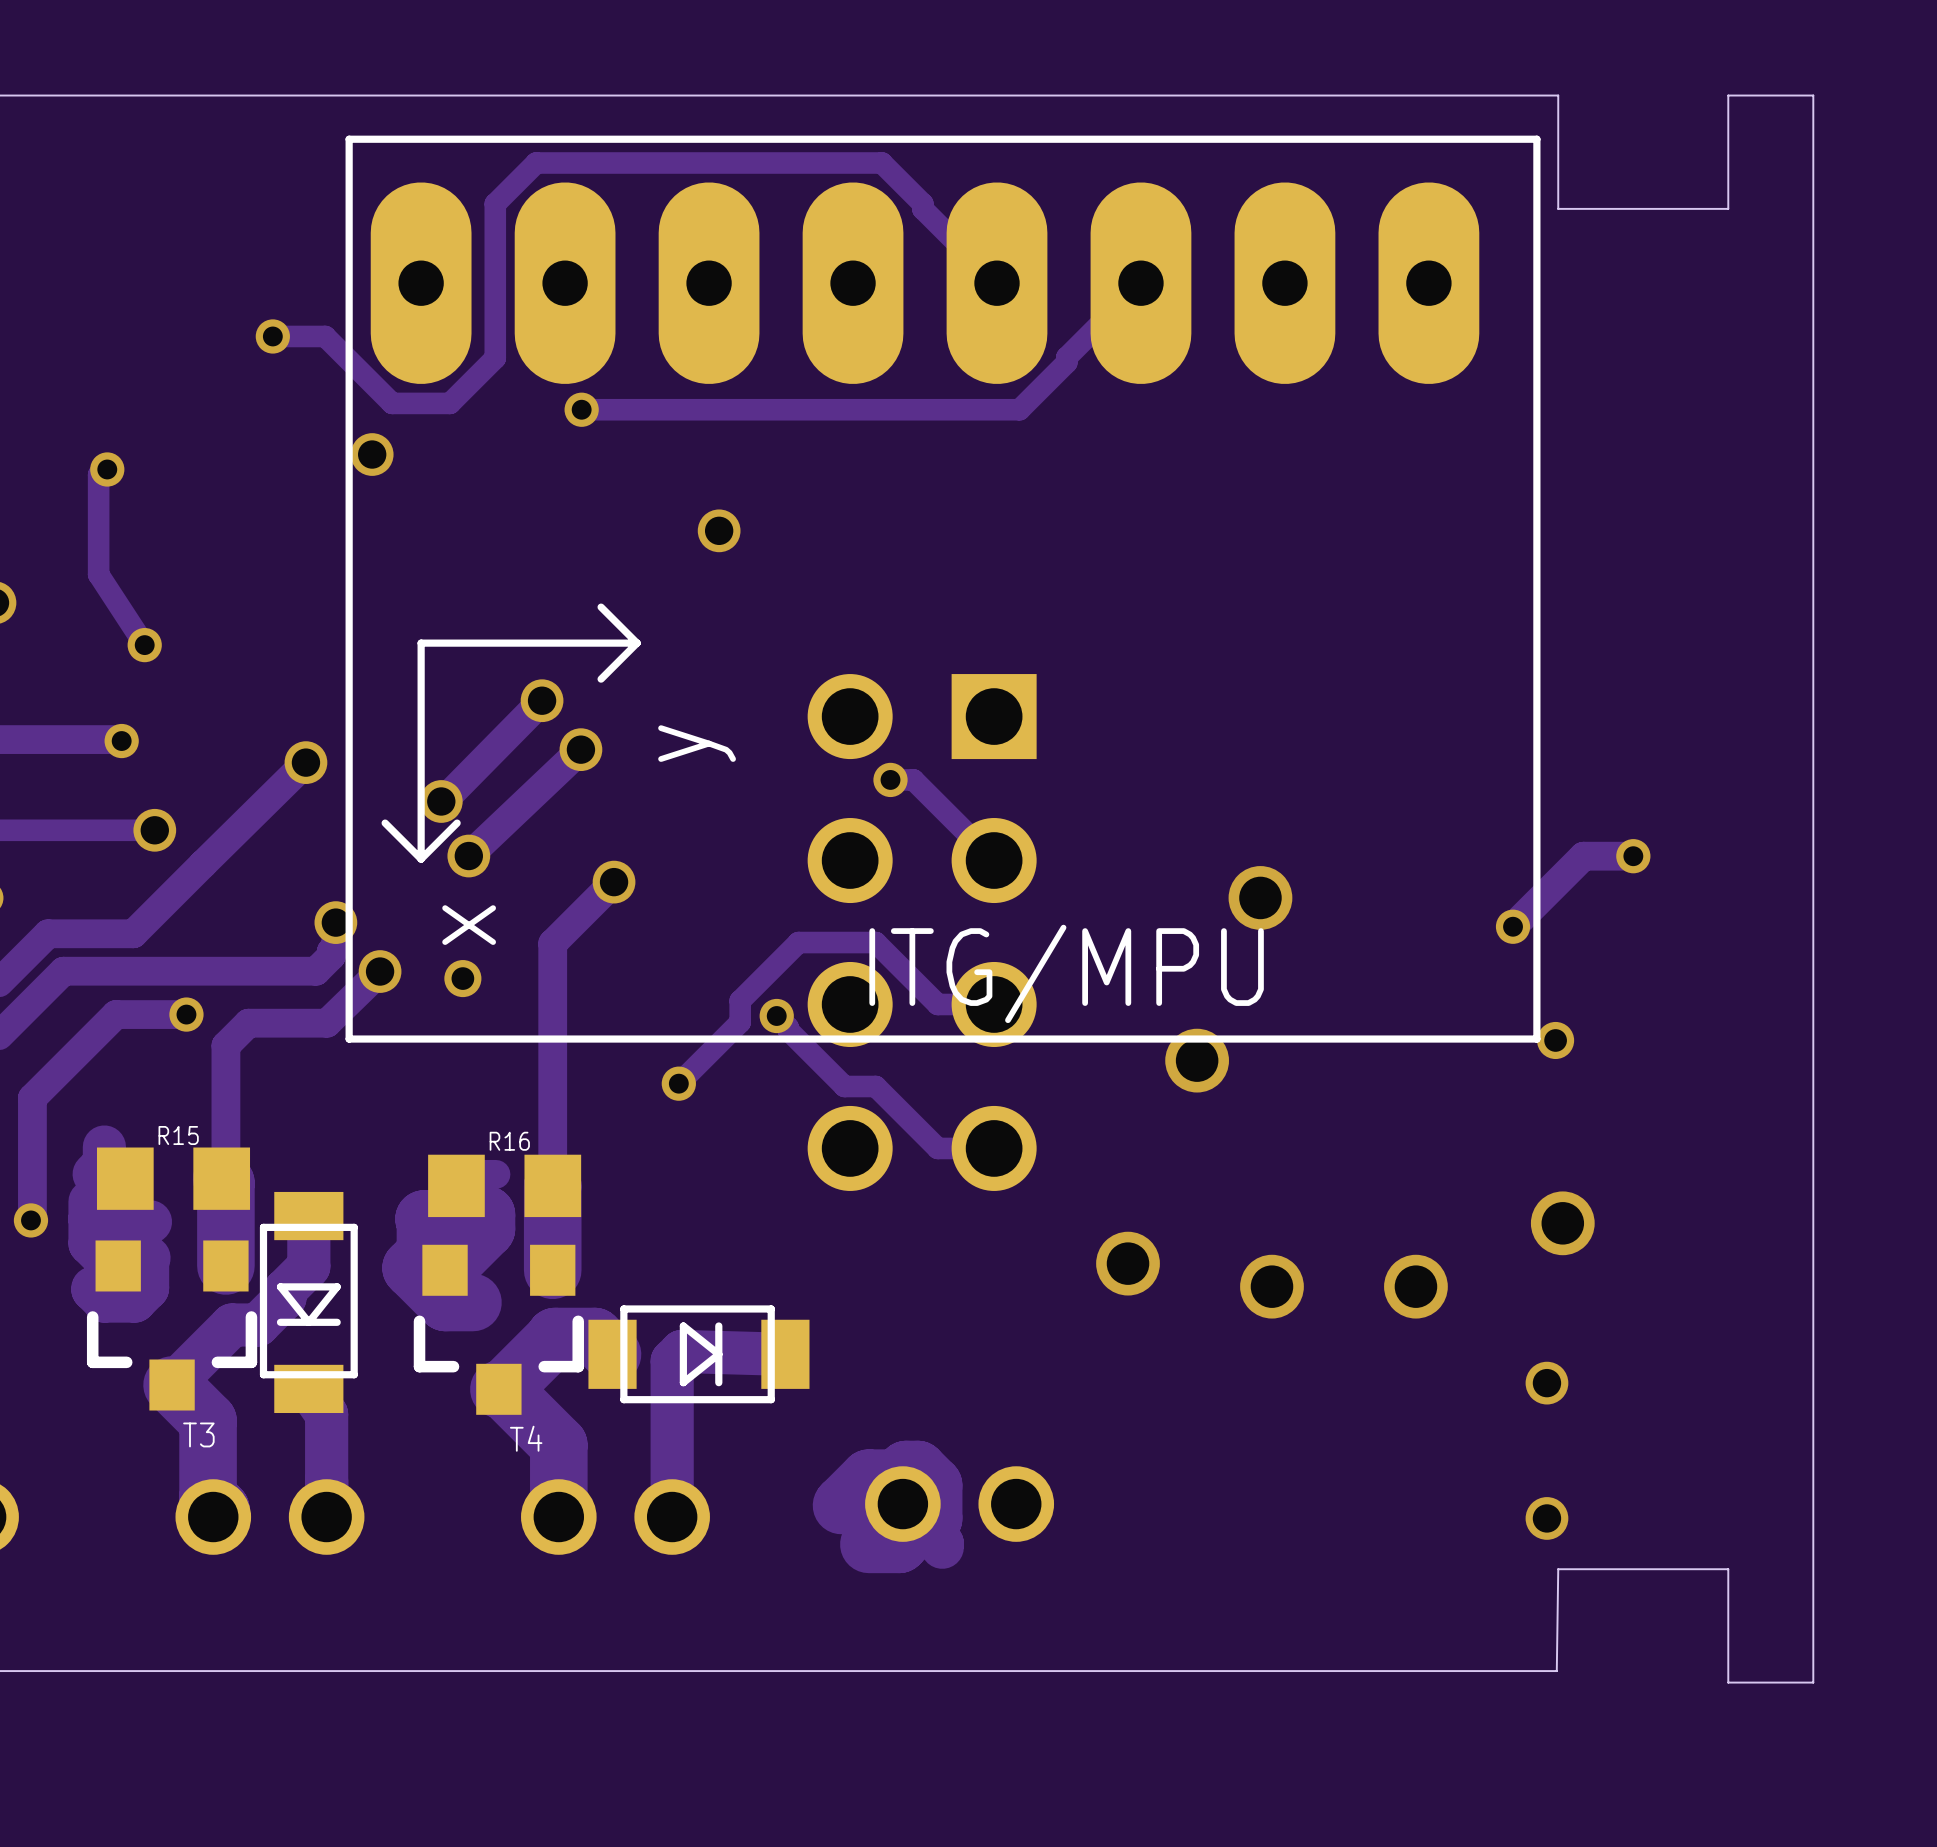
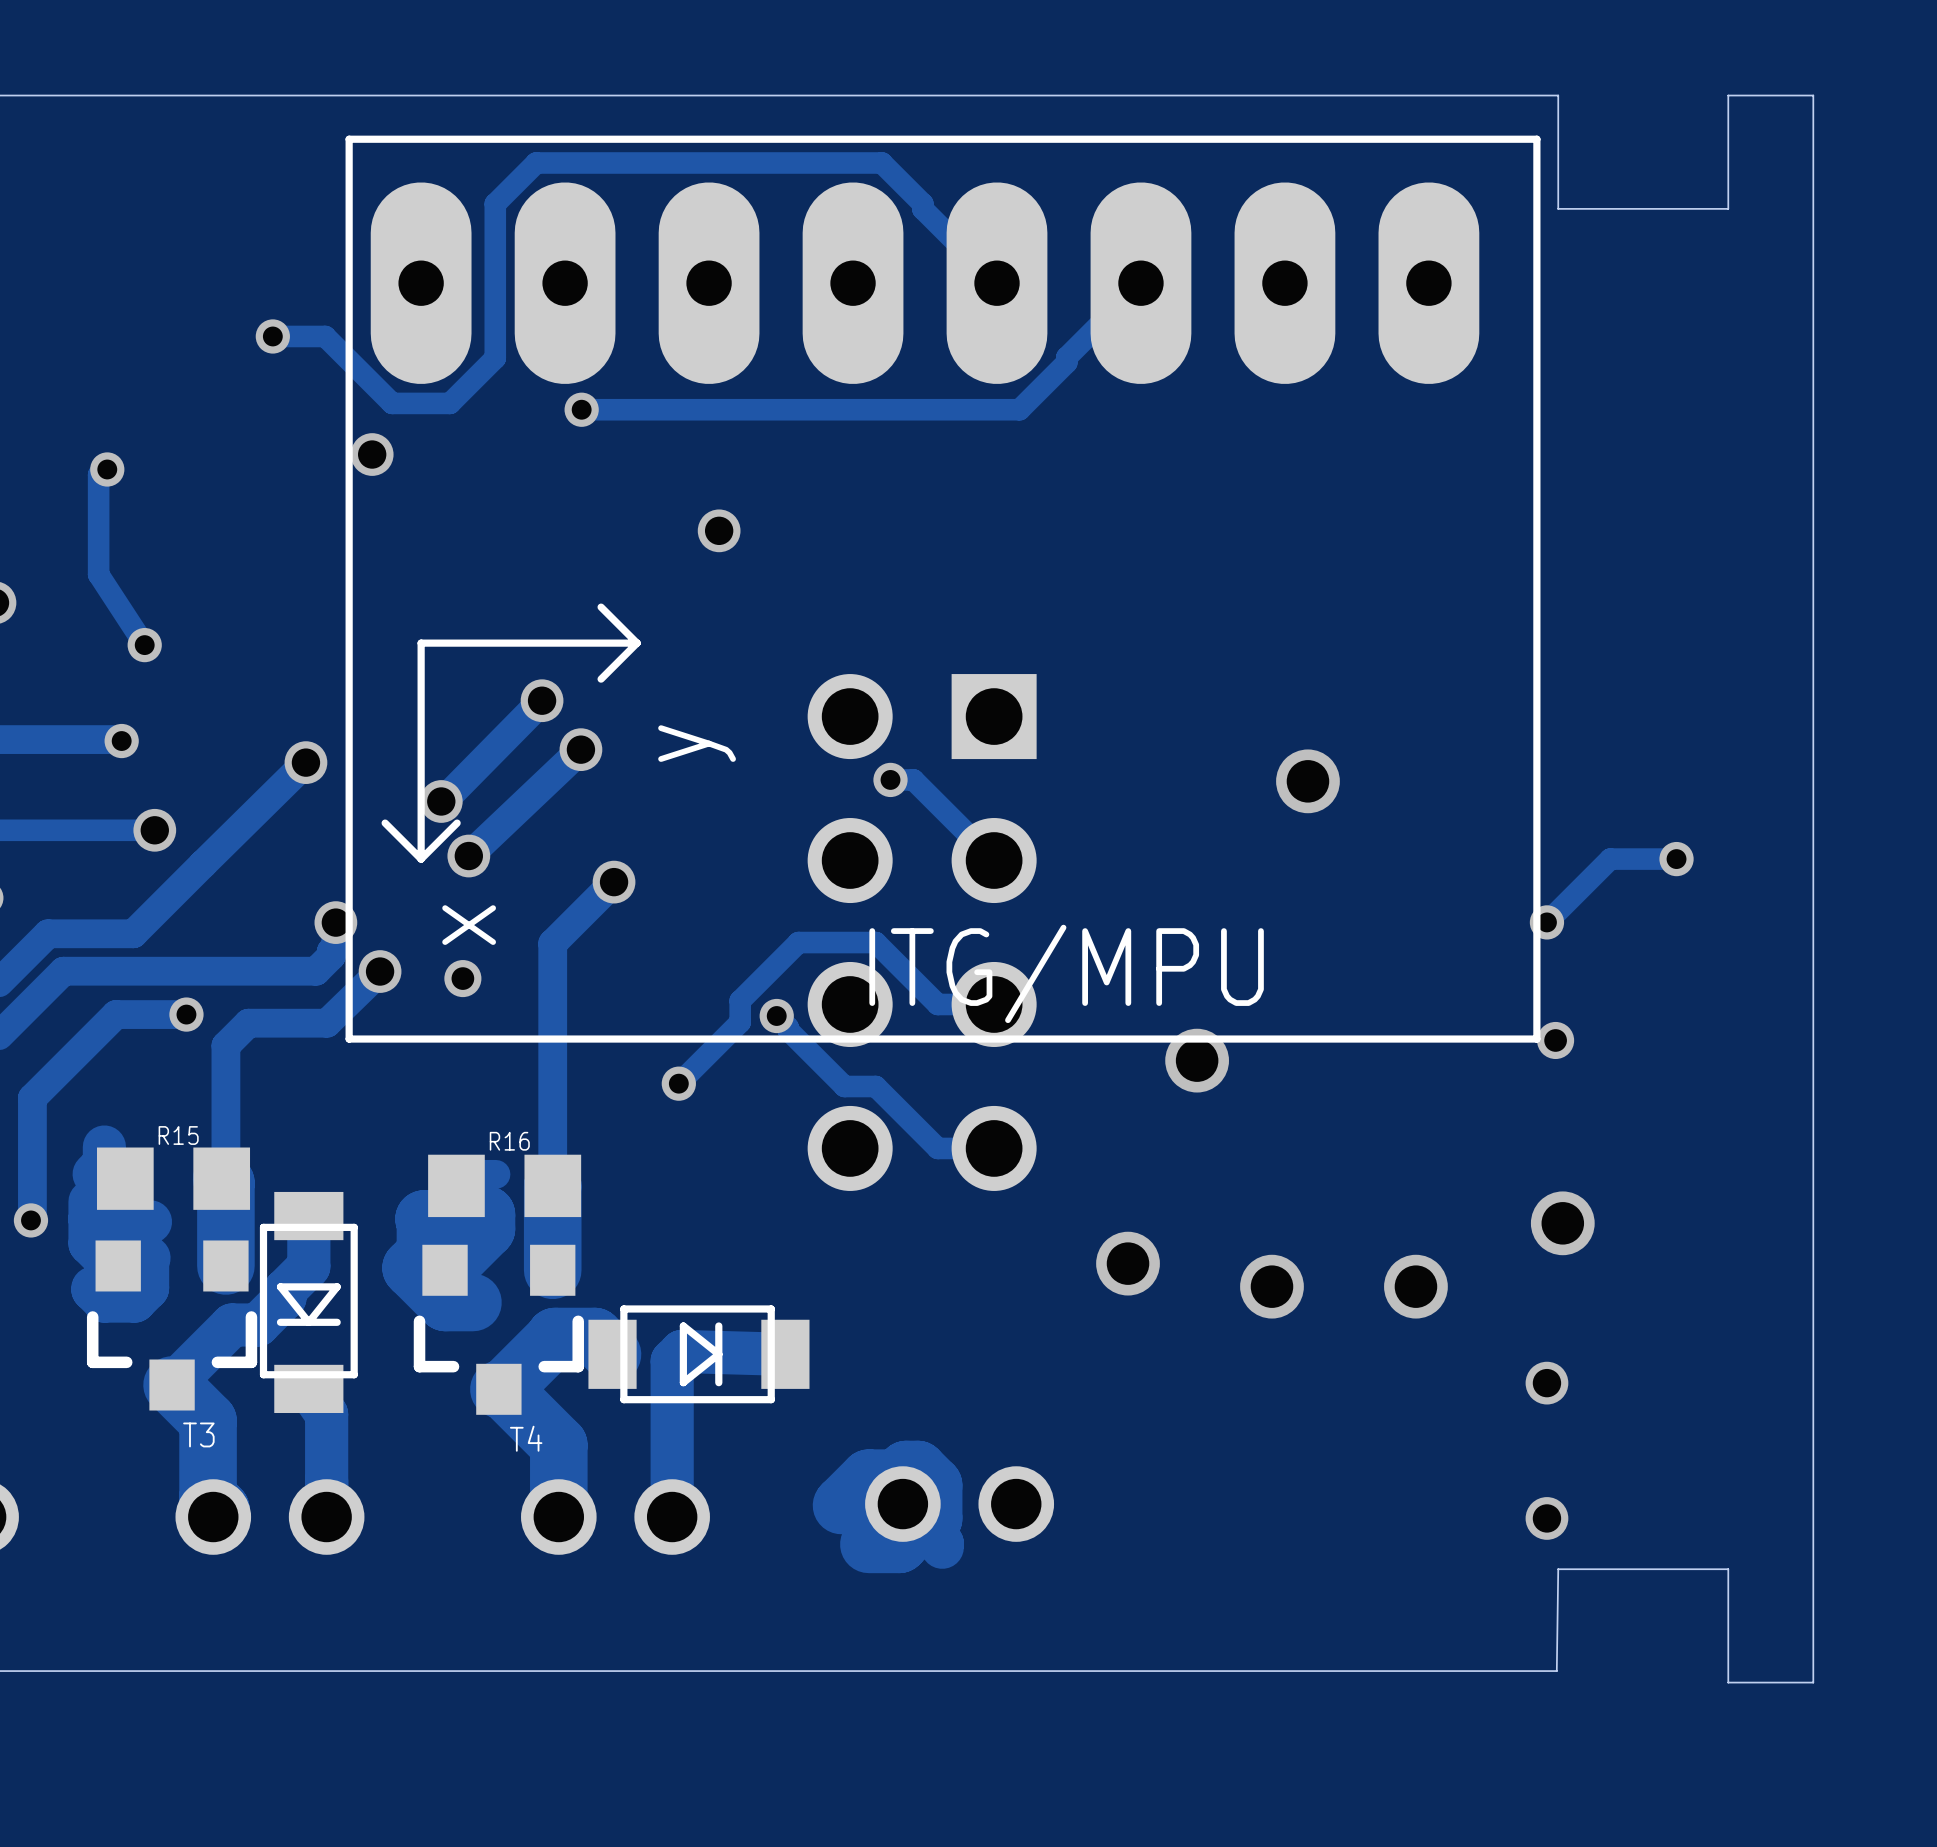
track: (1633, 856) (1583, 856) (1513, 926) -> none
via position: (1633, 856) -> (1676, 859)
track: none -> (1676, 859) (1610, 859) (1546, 922)
via position: (1260, 897) -> (1307, 781)
via position: (1513, 926) -> (1546, 922)

